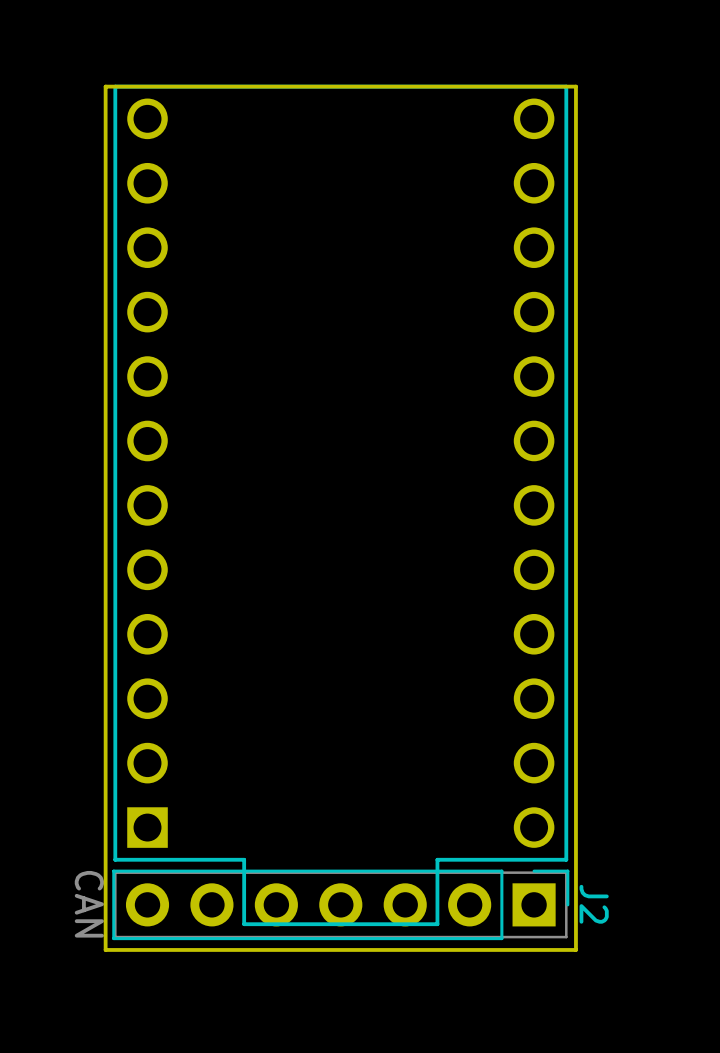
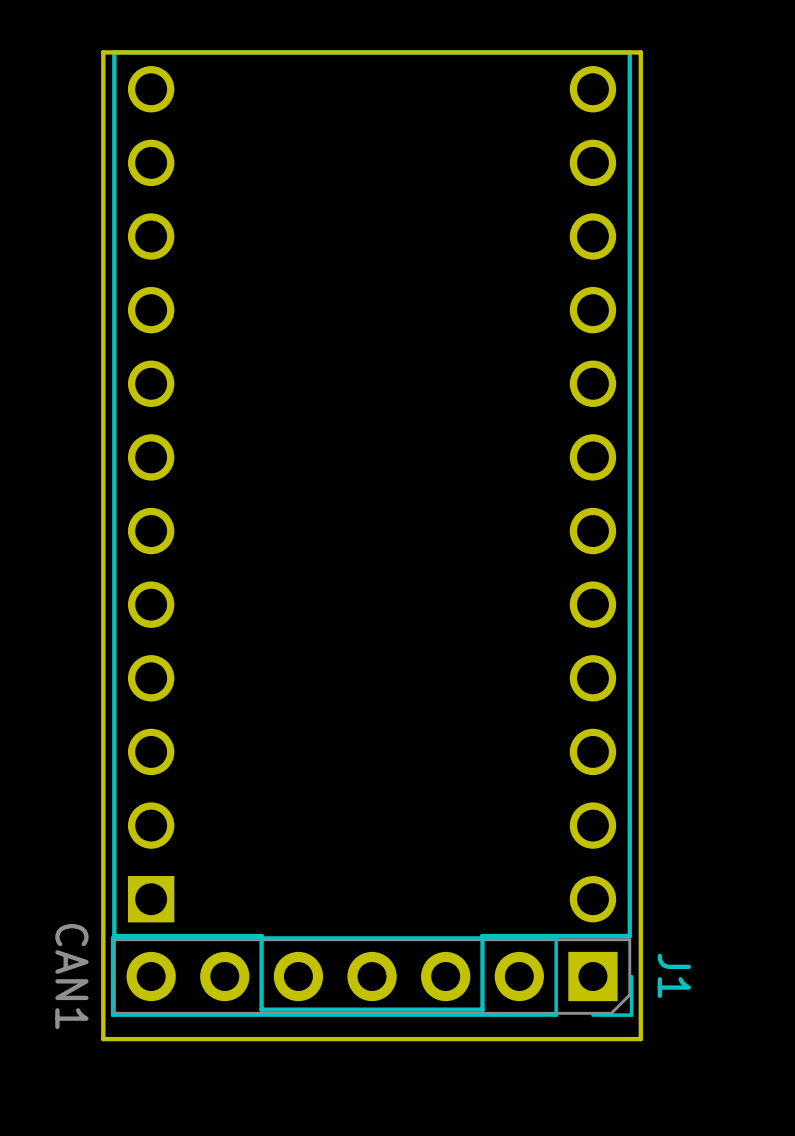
J1: none -> CAN1 (372, 976)
J2: CAN (340, 904) -> none

